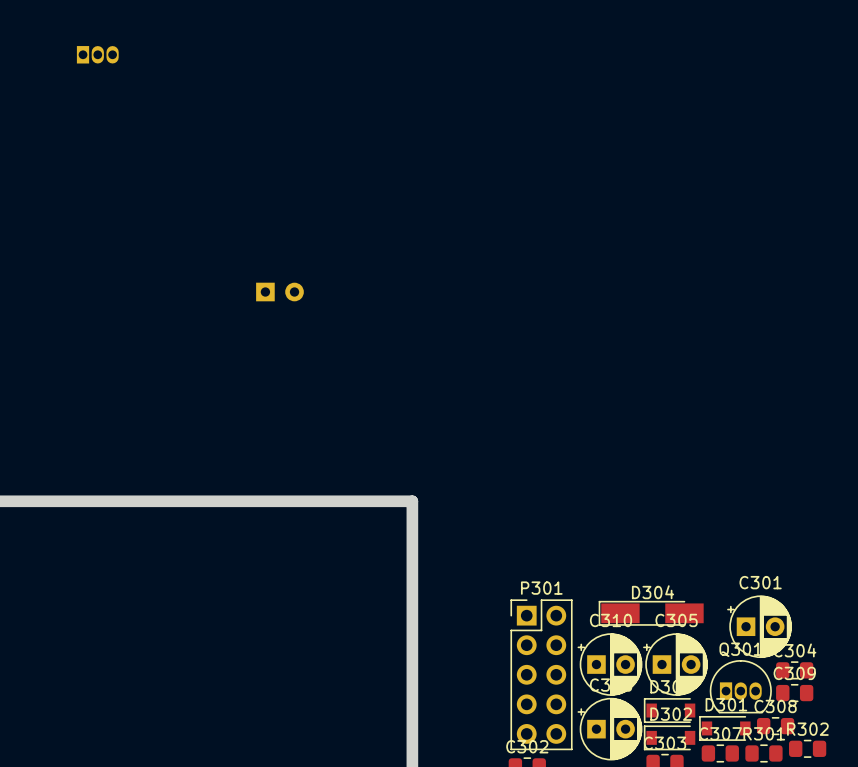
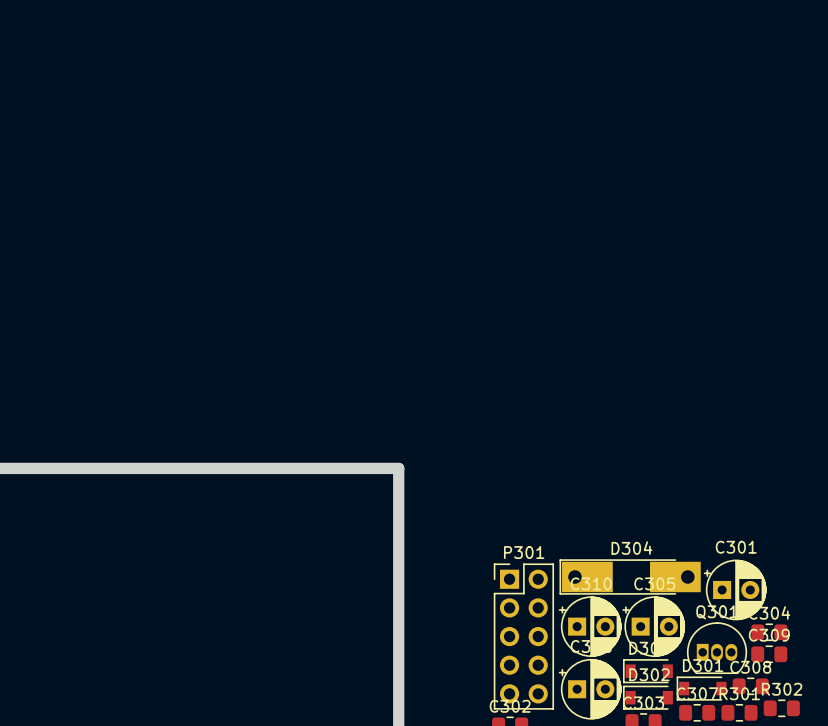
part: (97, 54) -> none
part: (279, 292) -> none
D304 footprint: [598, 600, 704, 626] -> [559, 559, 701, 595]

